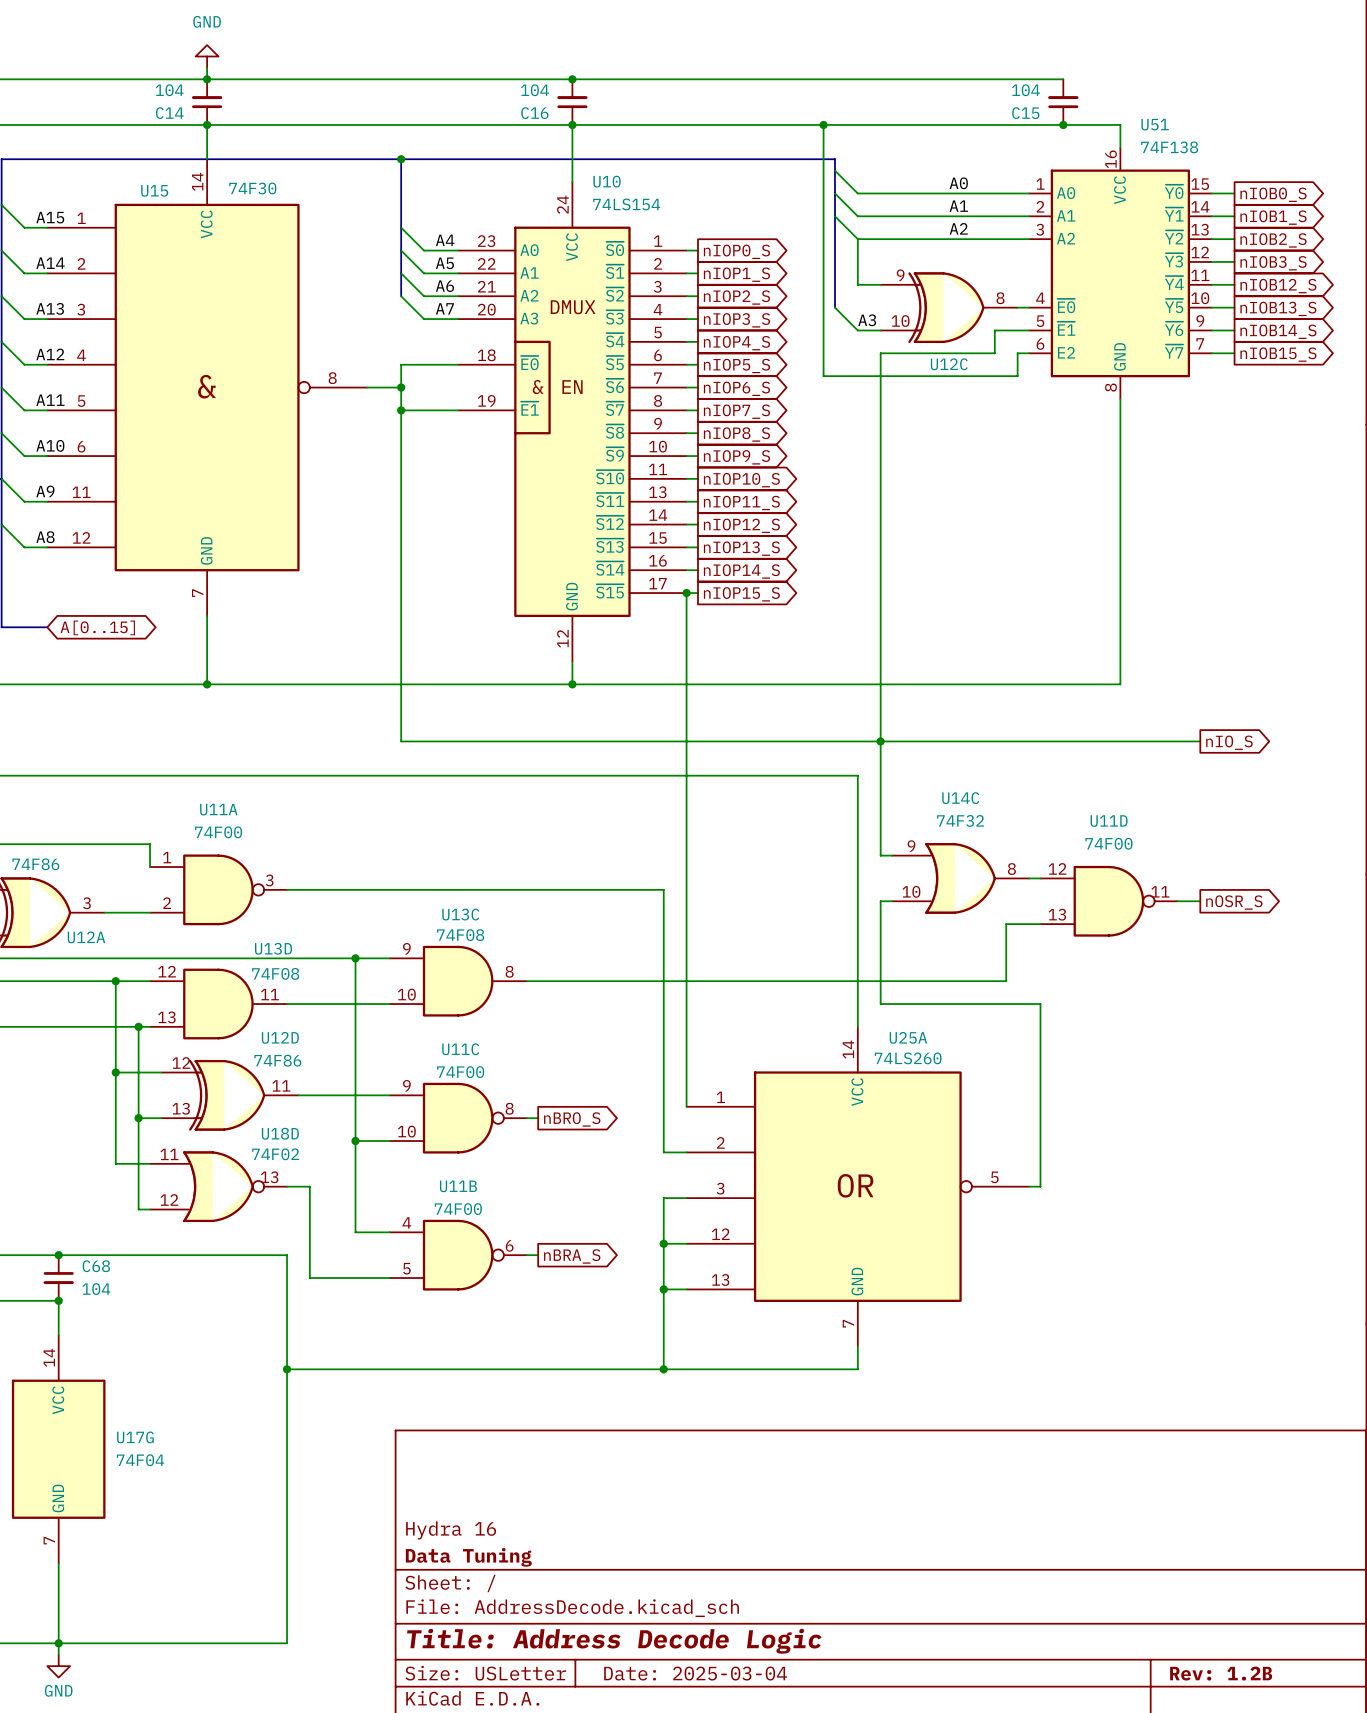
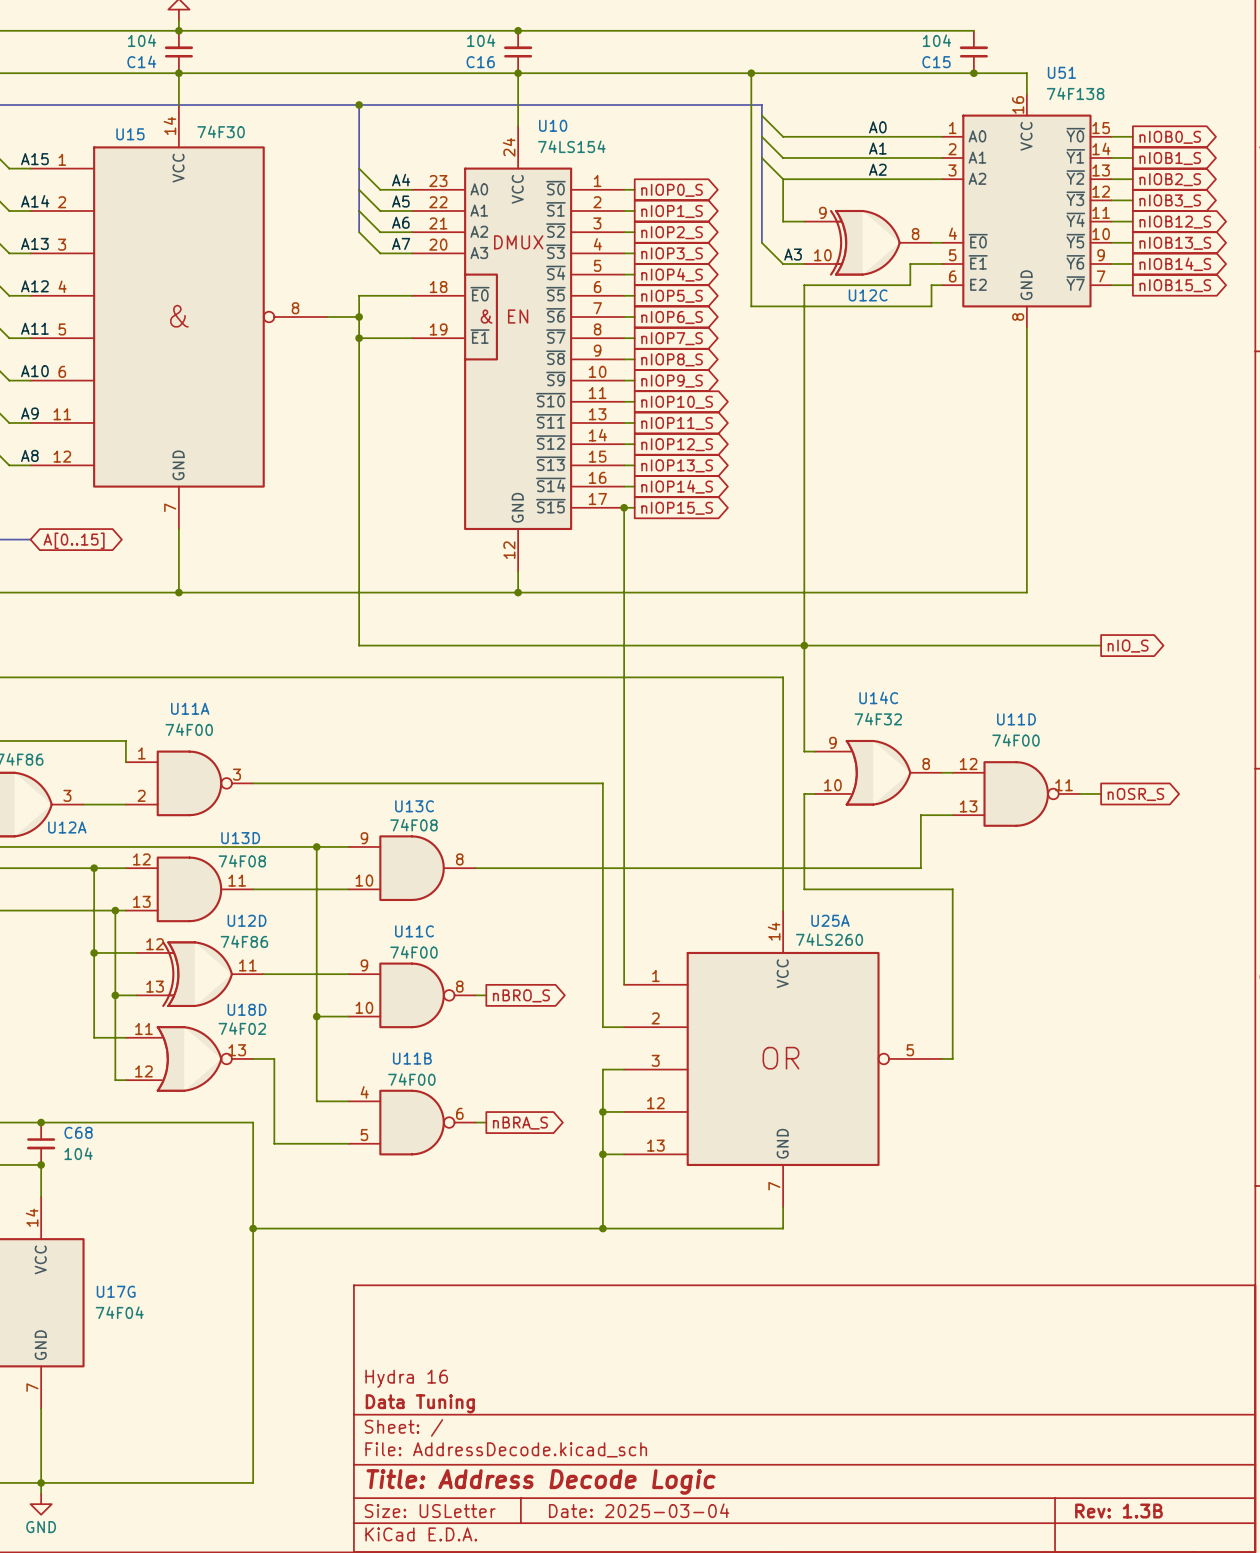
title block: Rev: 1.2B (1221, 1673) -> Rev: 1.3B (1118, 1511)

